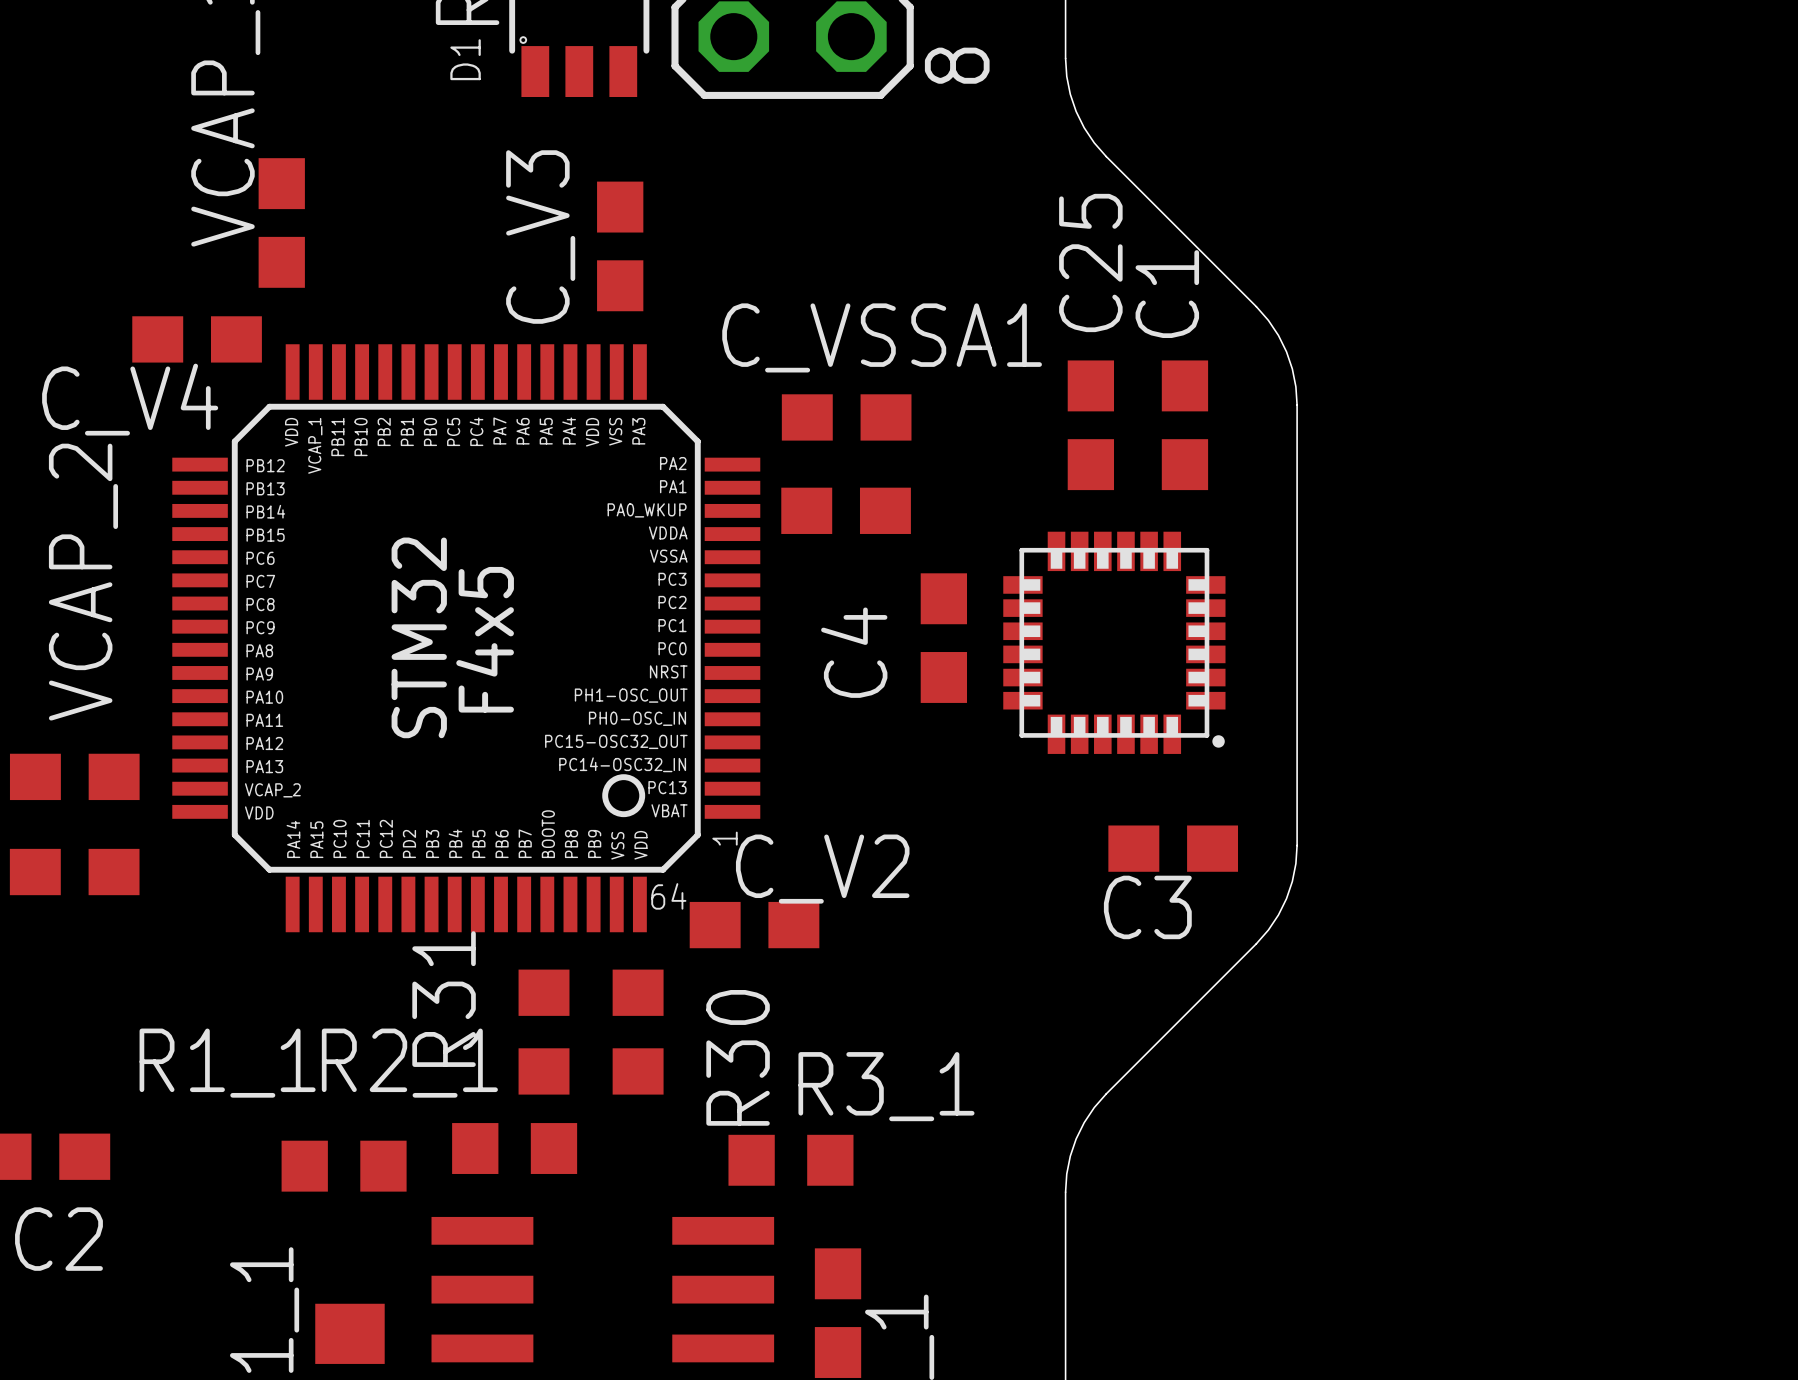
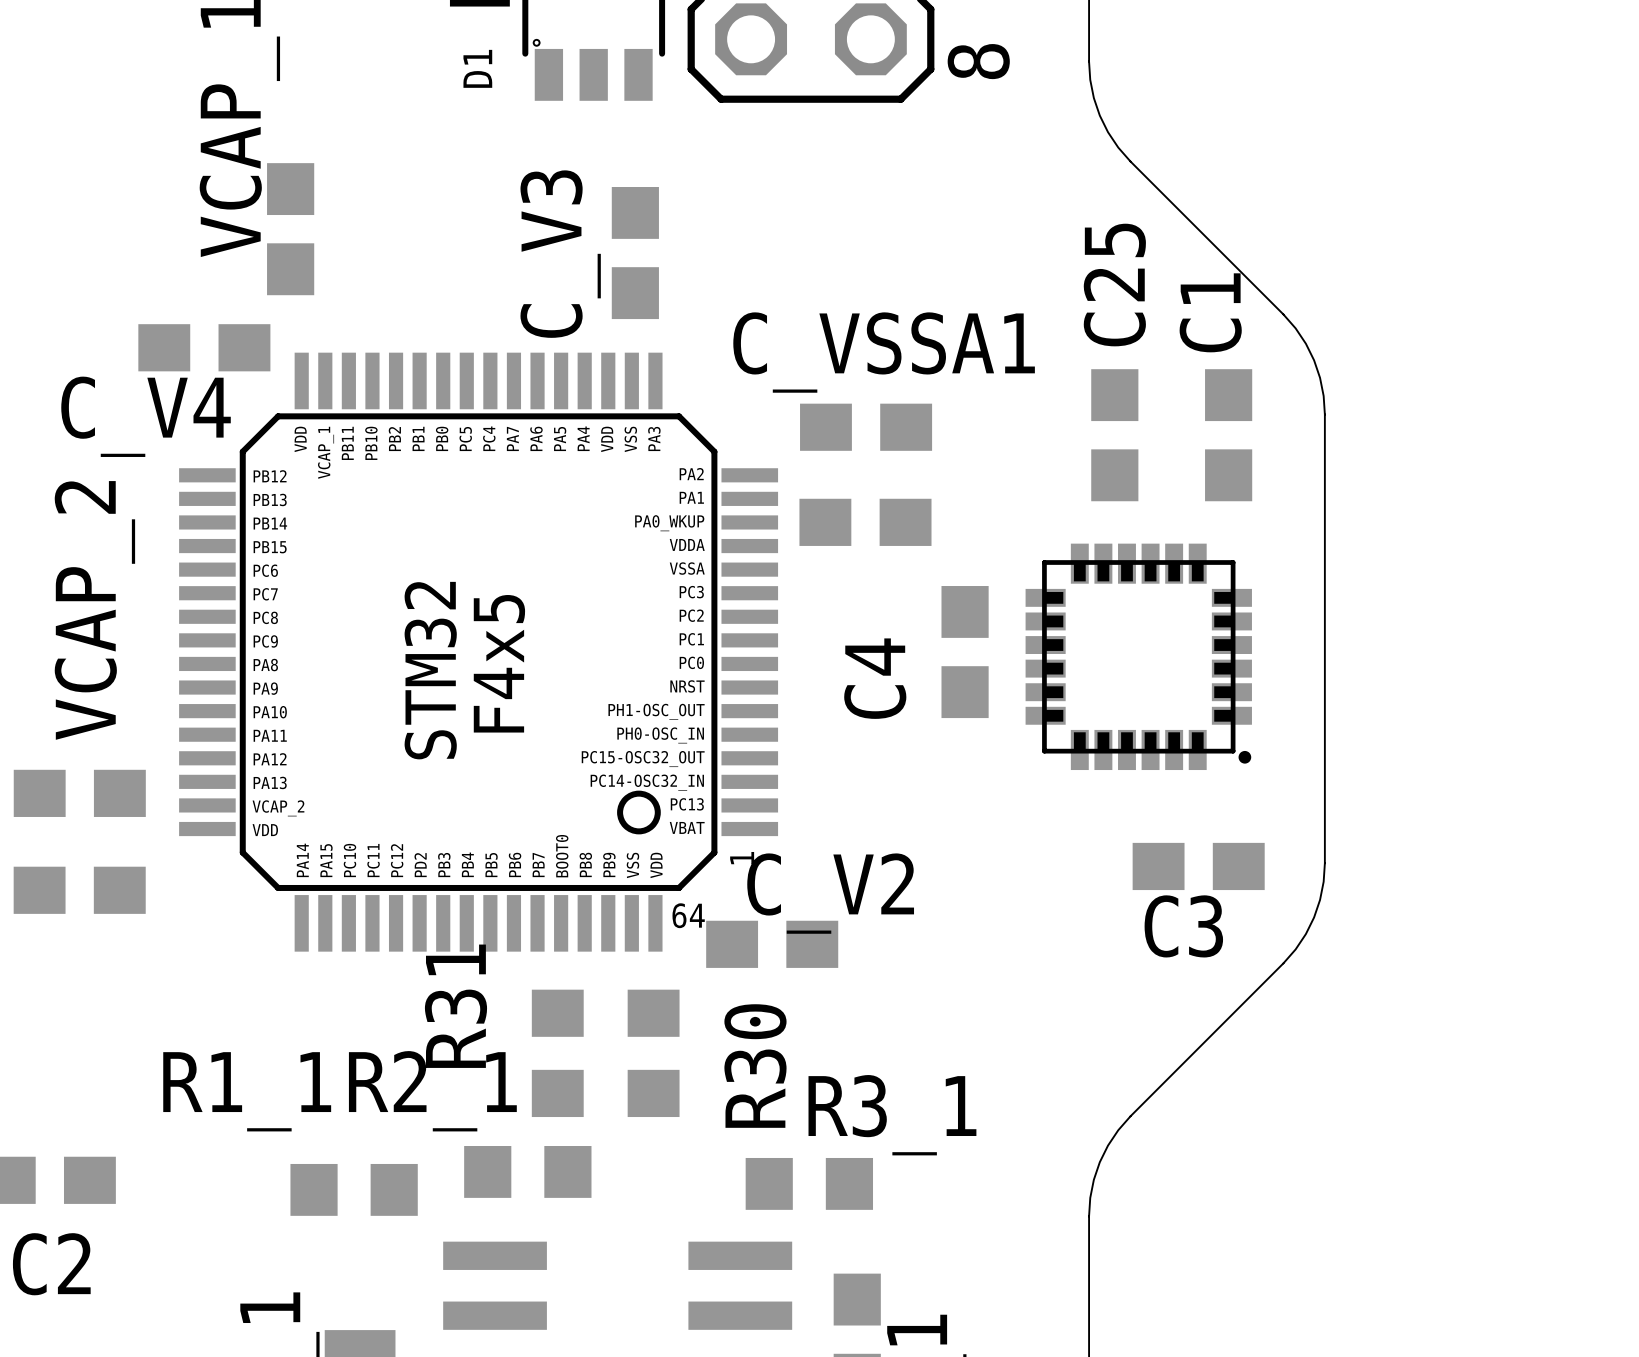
C1 position: (1184, 425) -> (1228, 435)

